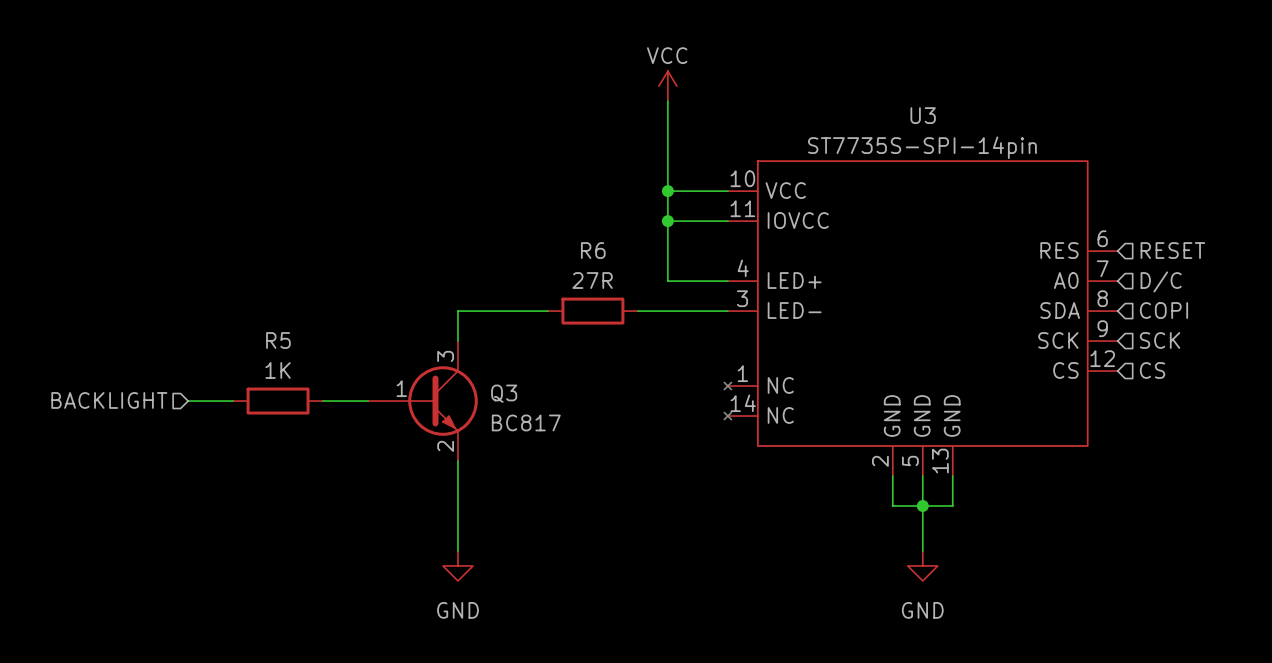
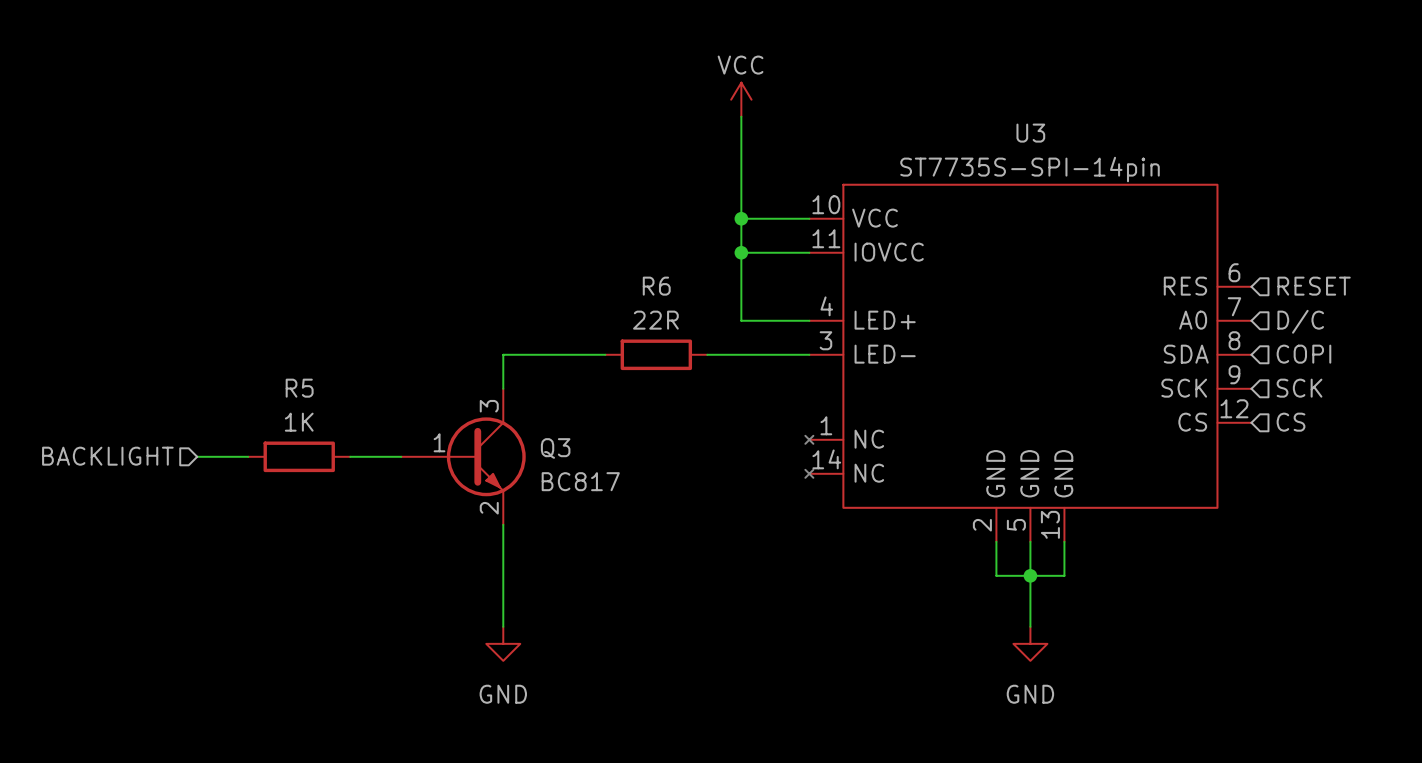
R6 value: 27R (592, 280) -> 22R (655, 320)

